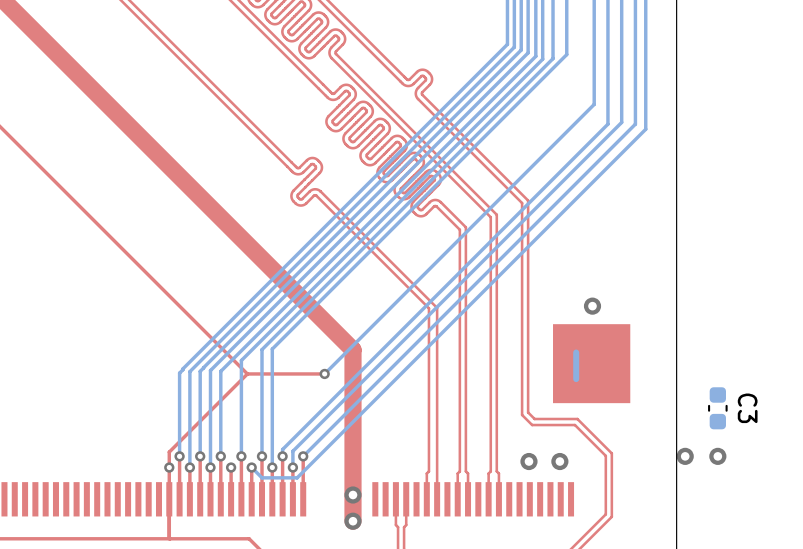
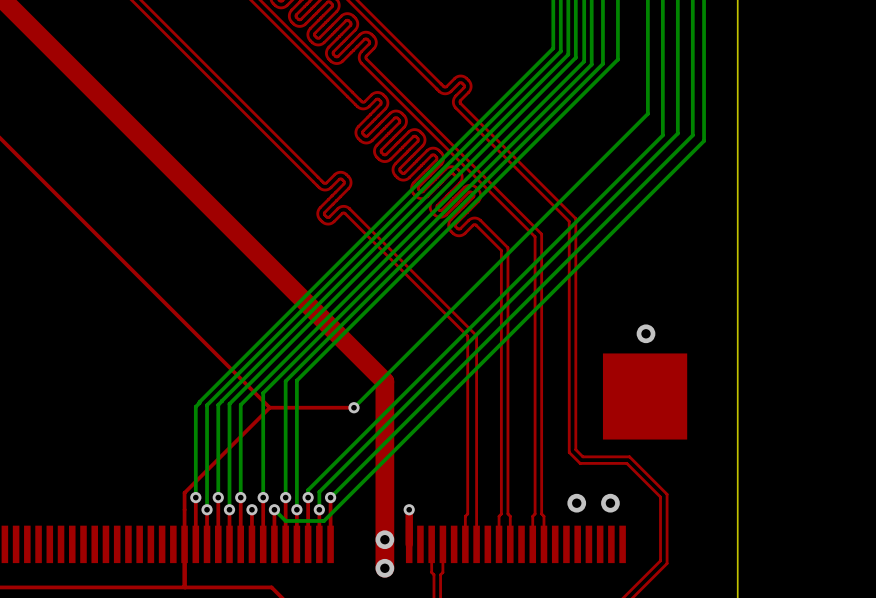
bottom track: (576, 352) (576, 379) -> none
C3: (717, 408) -> none
via: (685, 456) -> none
via: (717, 456) -> none
via: (169, 467) -> none
top track: none -> (409, 509) (409, 544)
via: none -> (409, 509)

